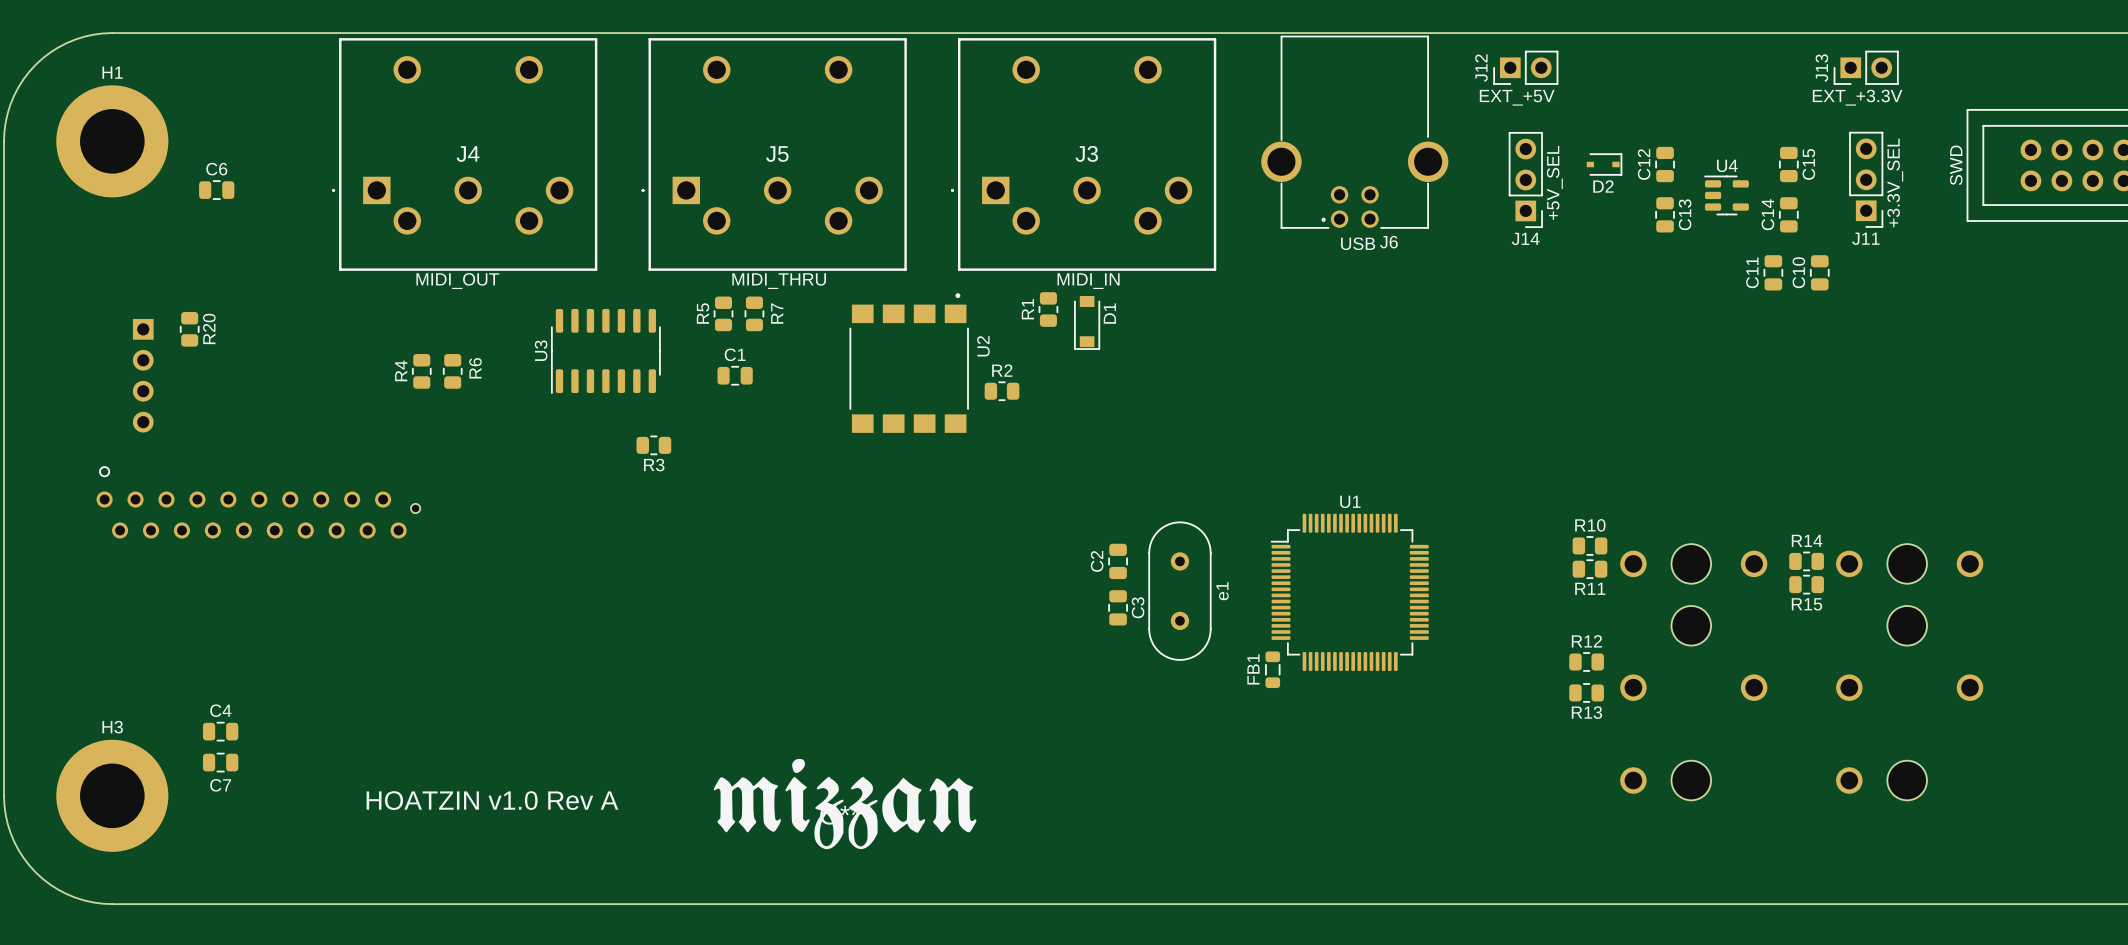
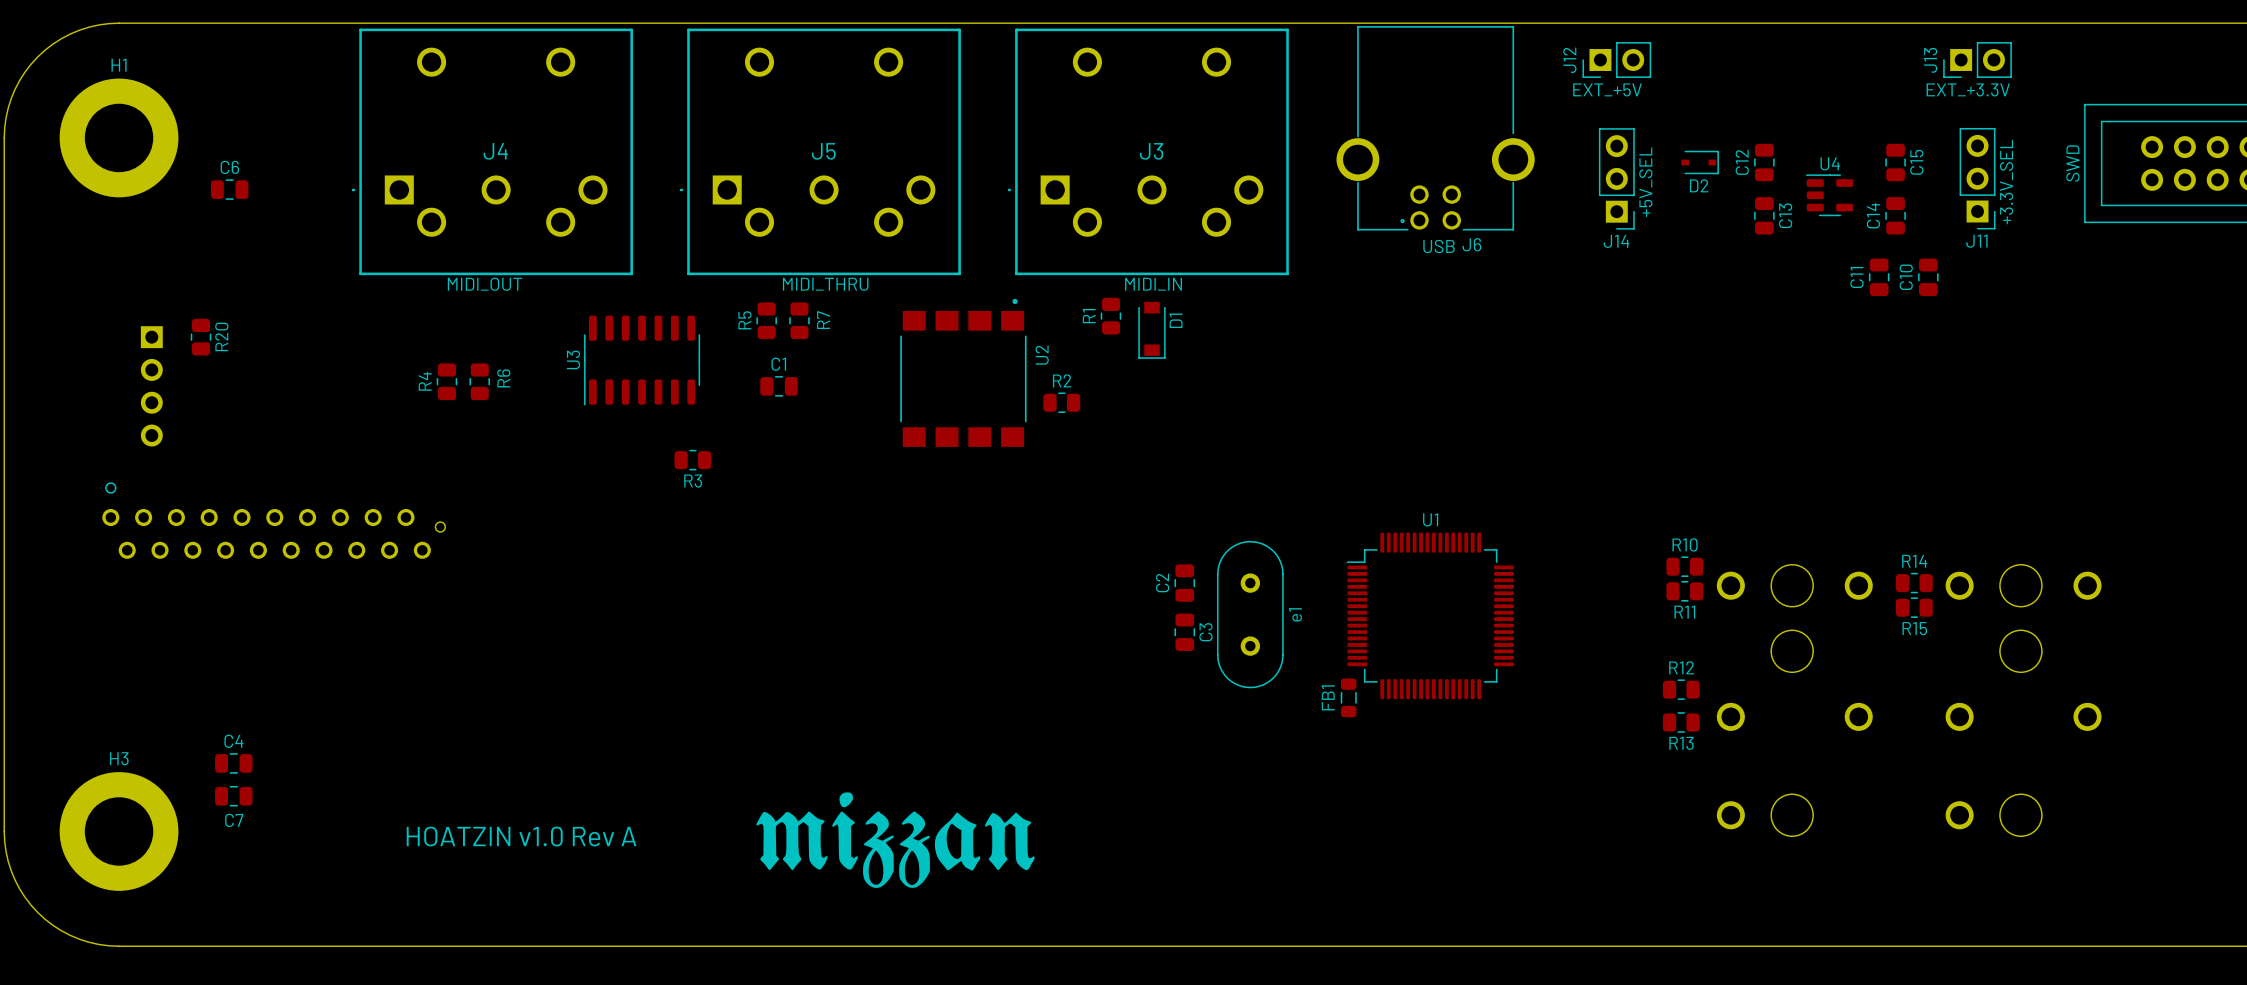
drawing: none -> [756, 792, 1035, 889]
part: (845, 804) -> none

